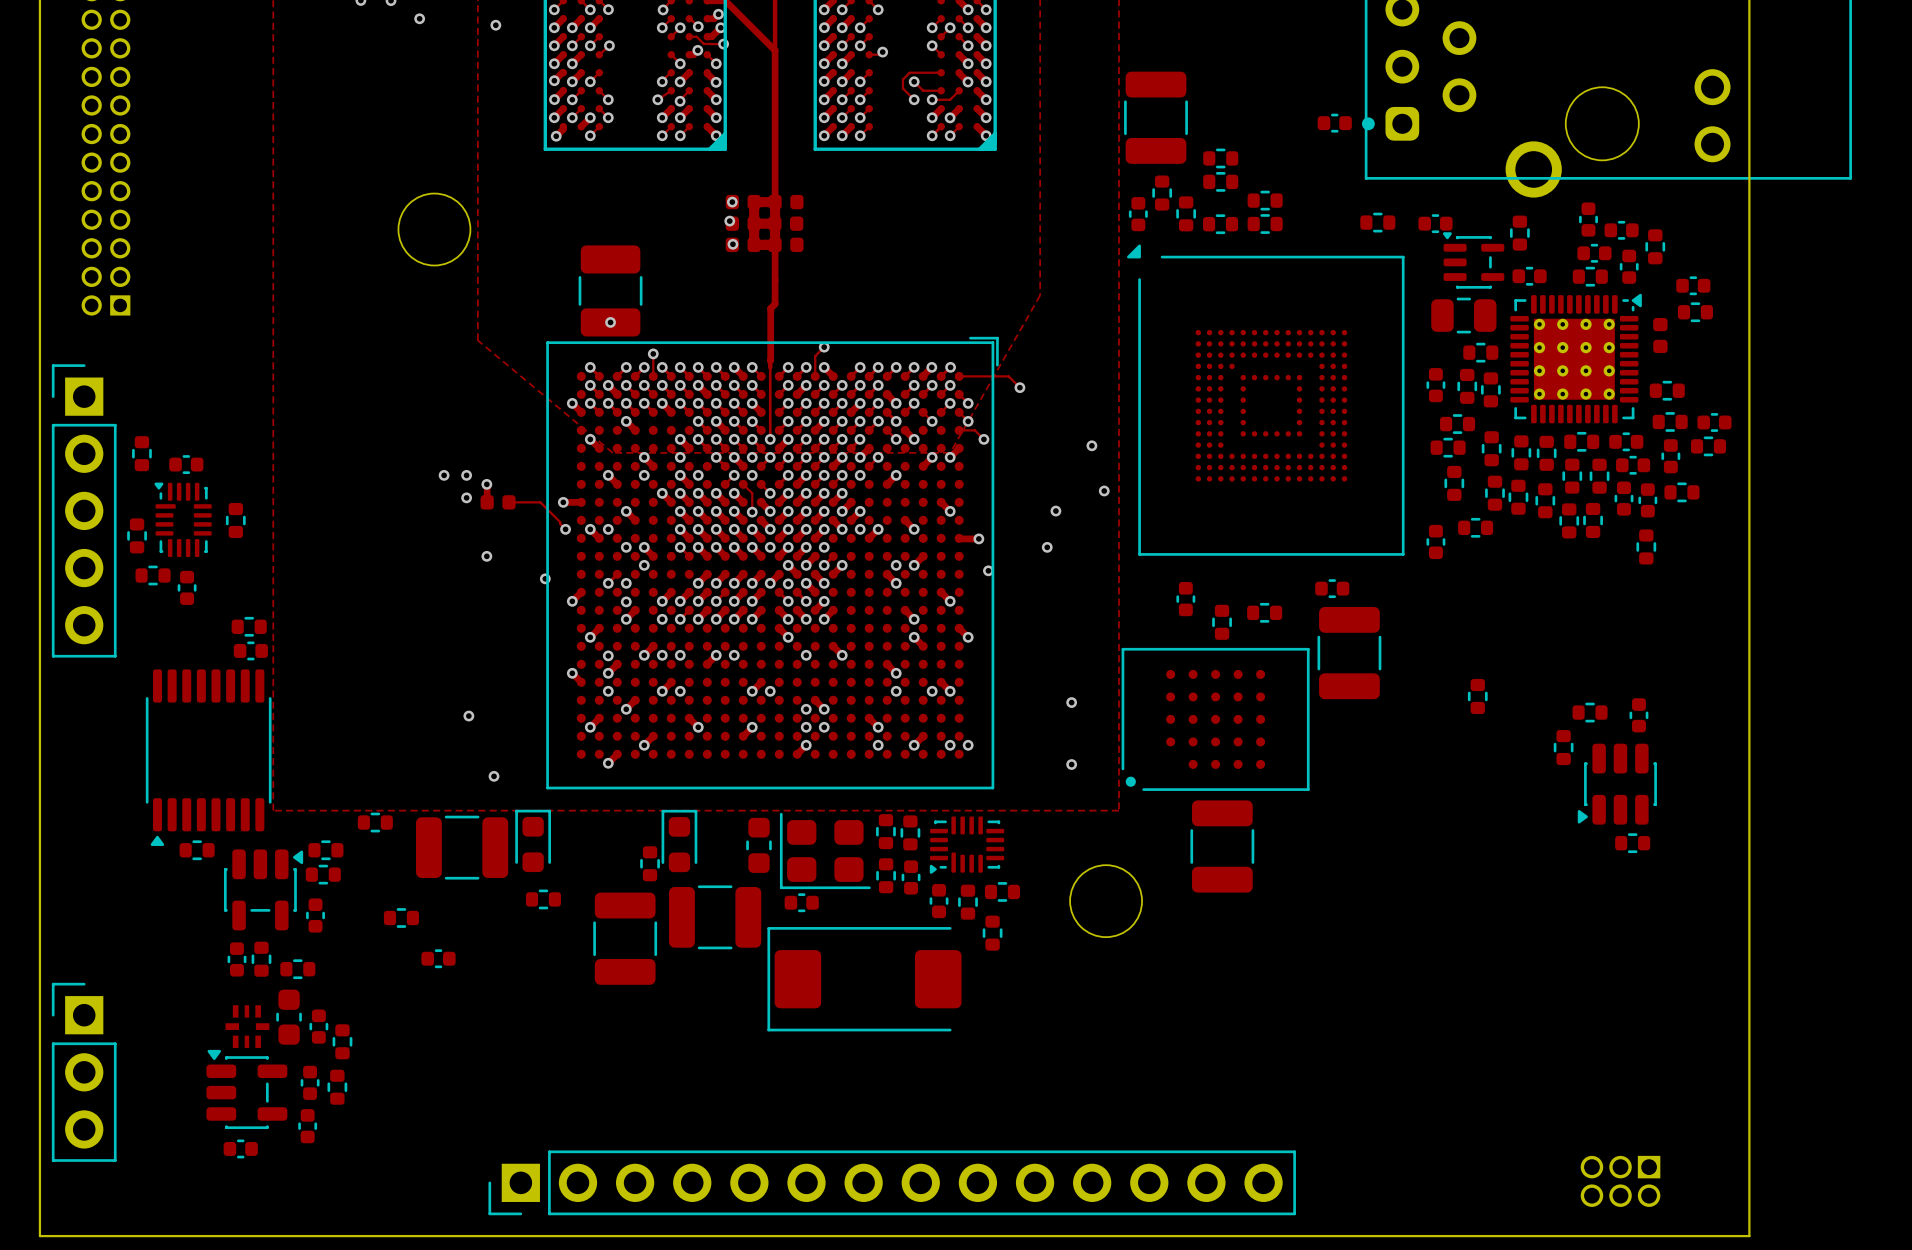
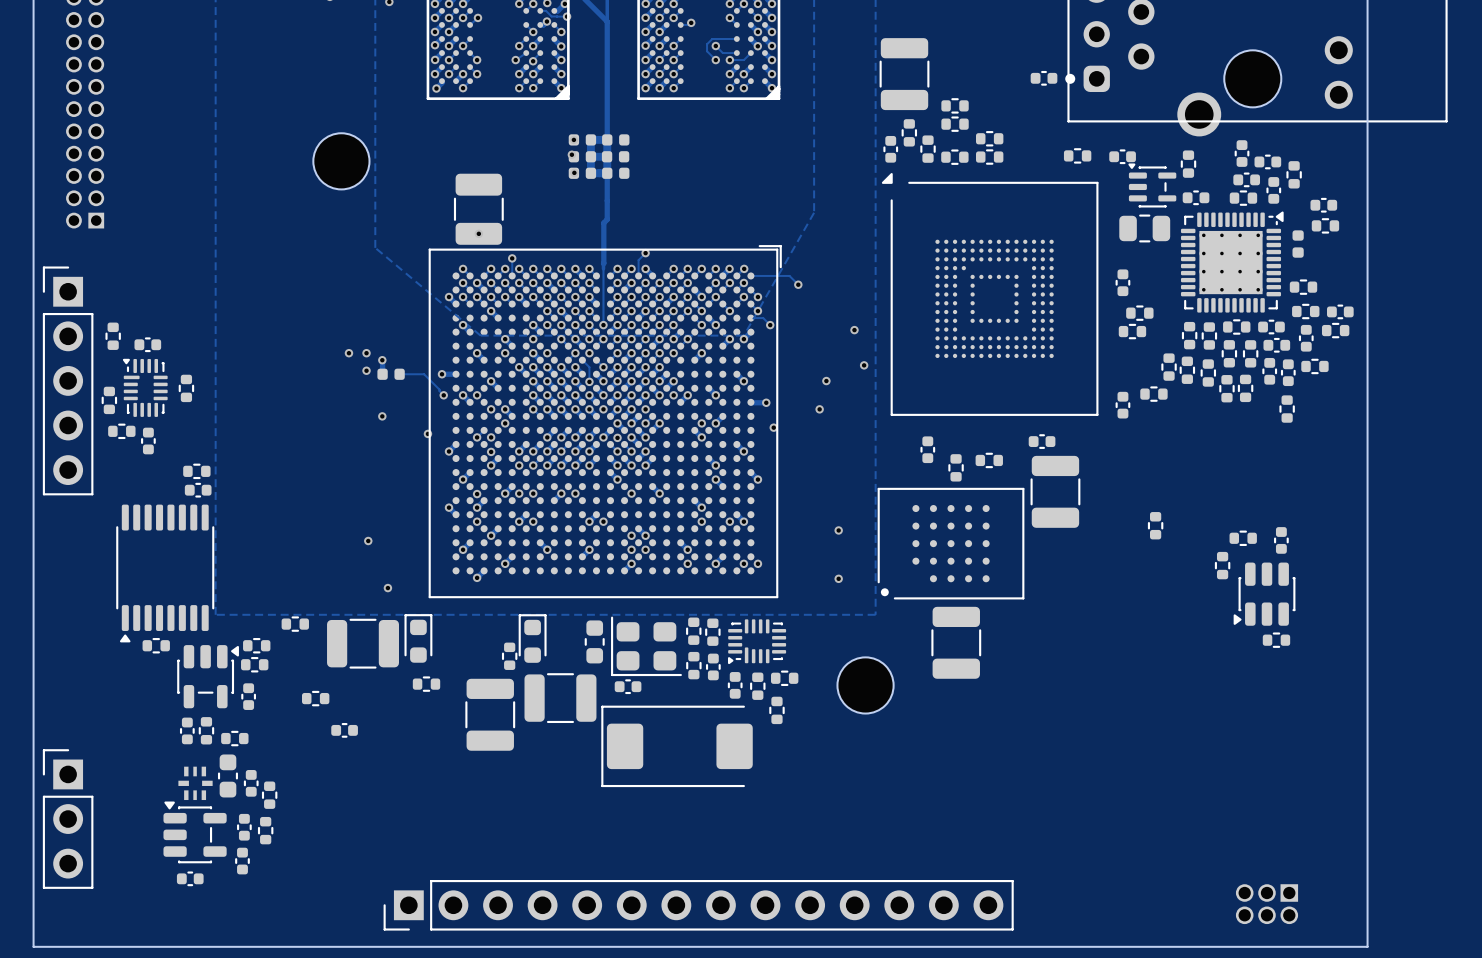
part: (1480, 352) -> none
part: (1467, 386) -> none
part: (1490, 389) -> none
part: (1491, 448) -> none
part: (1454, 483) -> none

